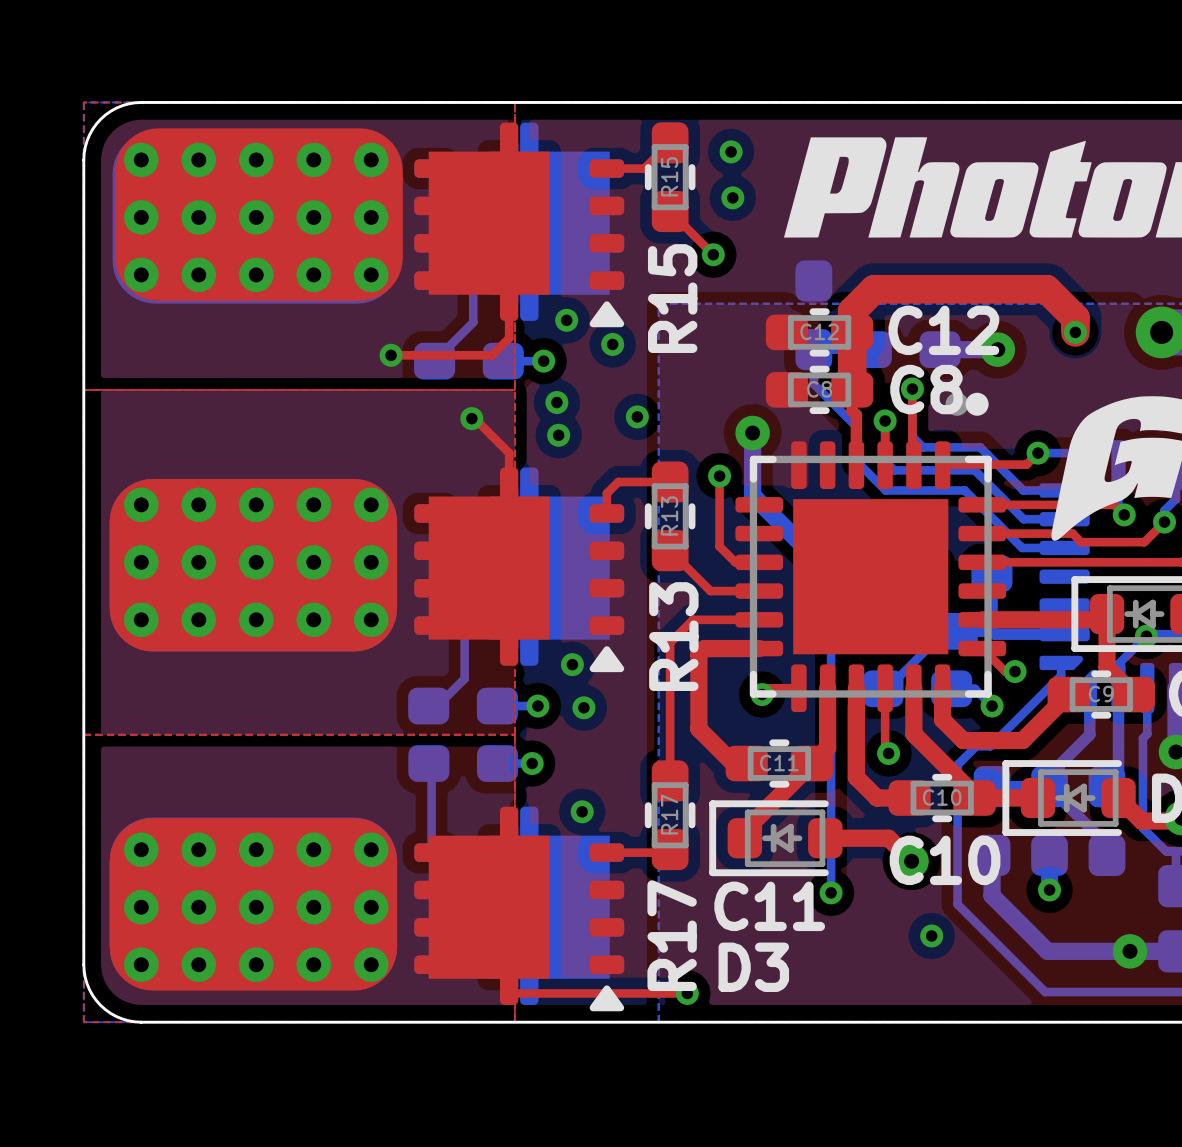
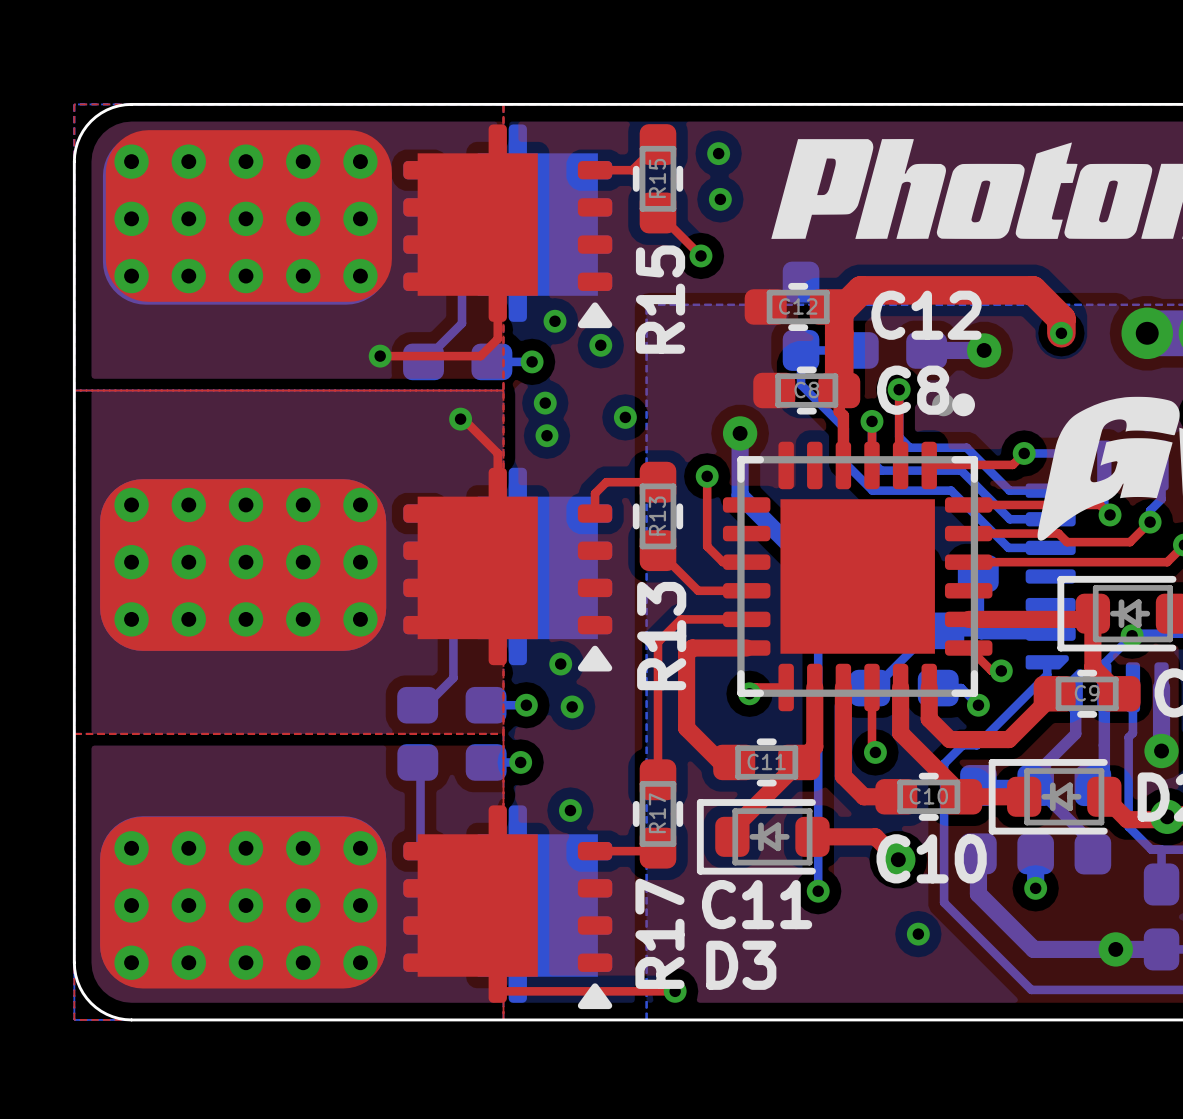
text position: C12 (943, 330) -> C12 (926, 315)
C12 position: (819, 332) -> (798, 306)

